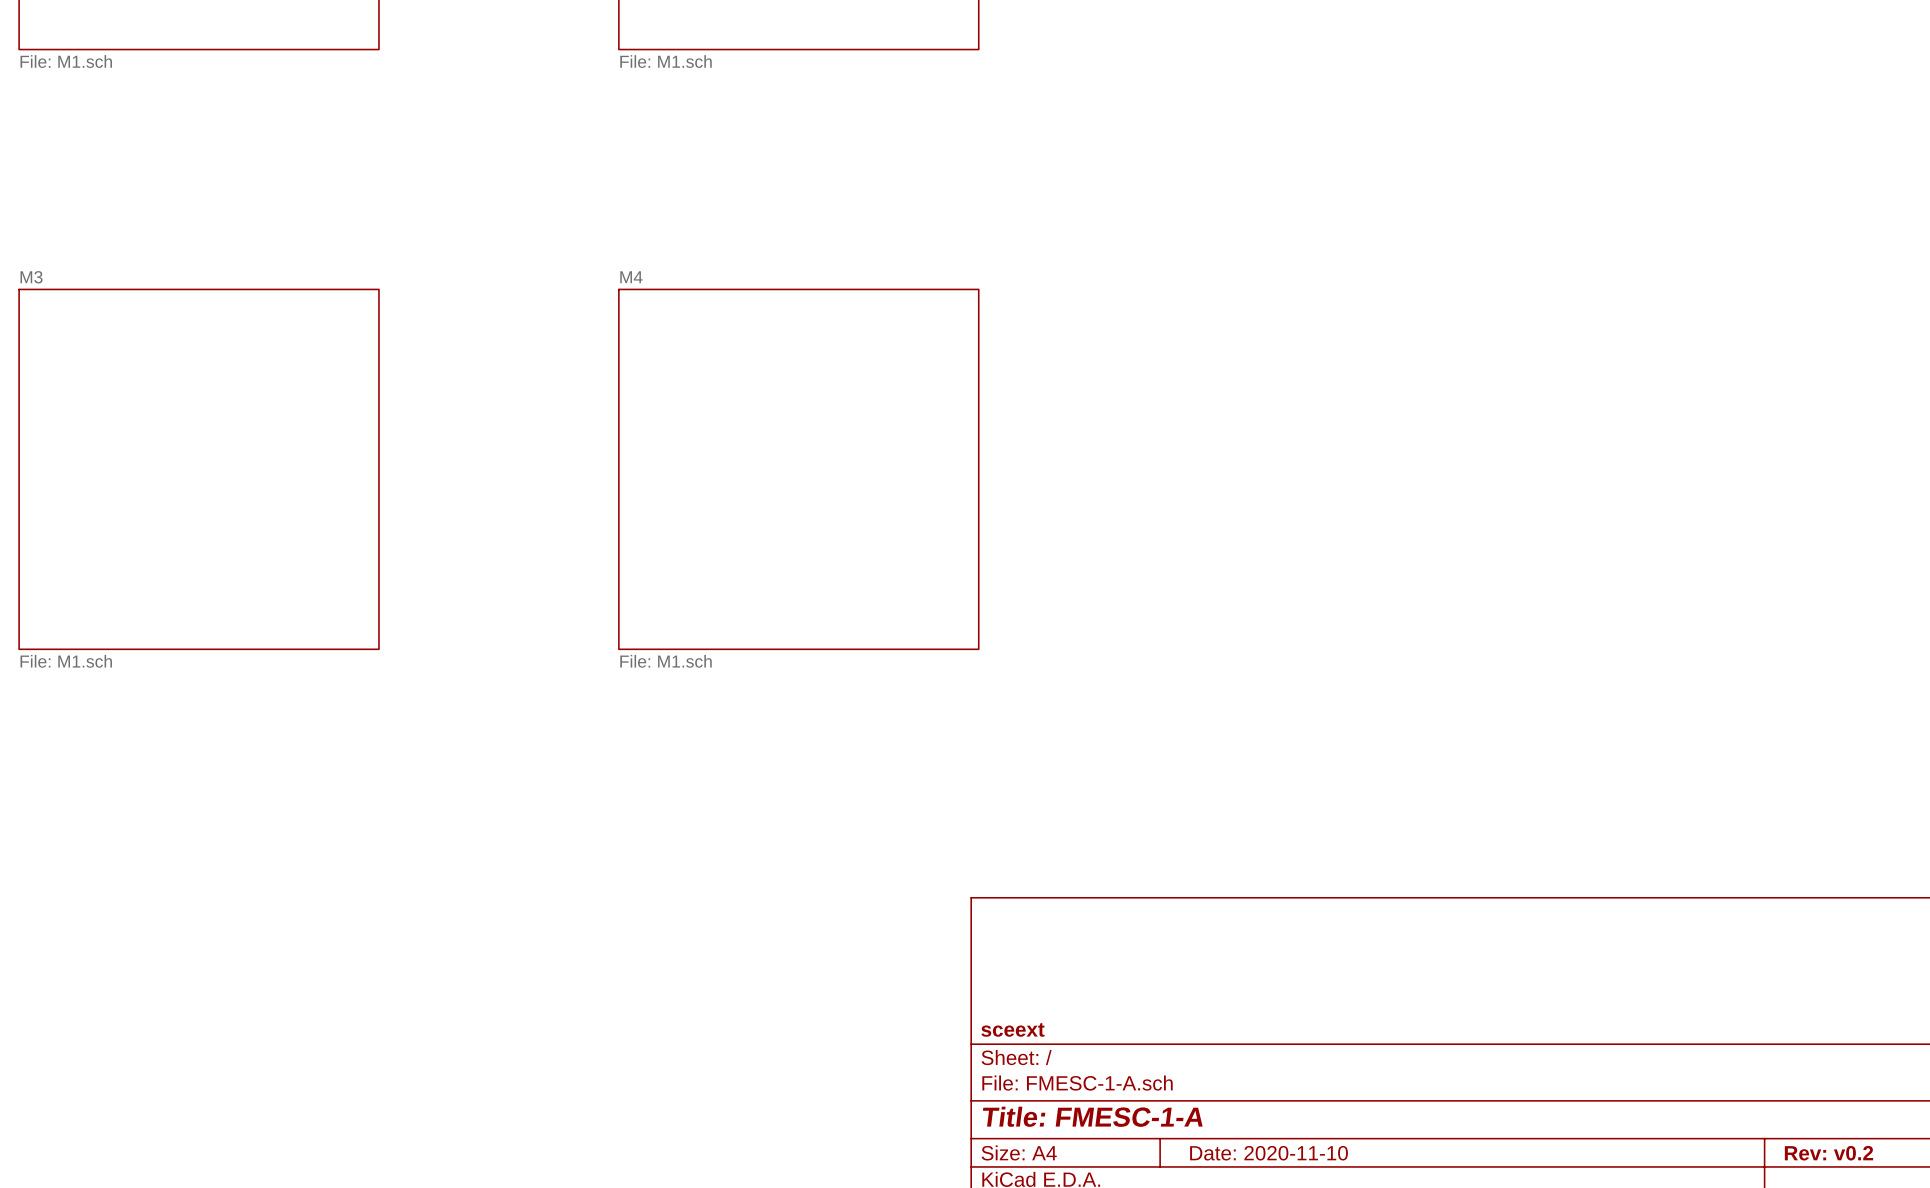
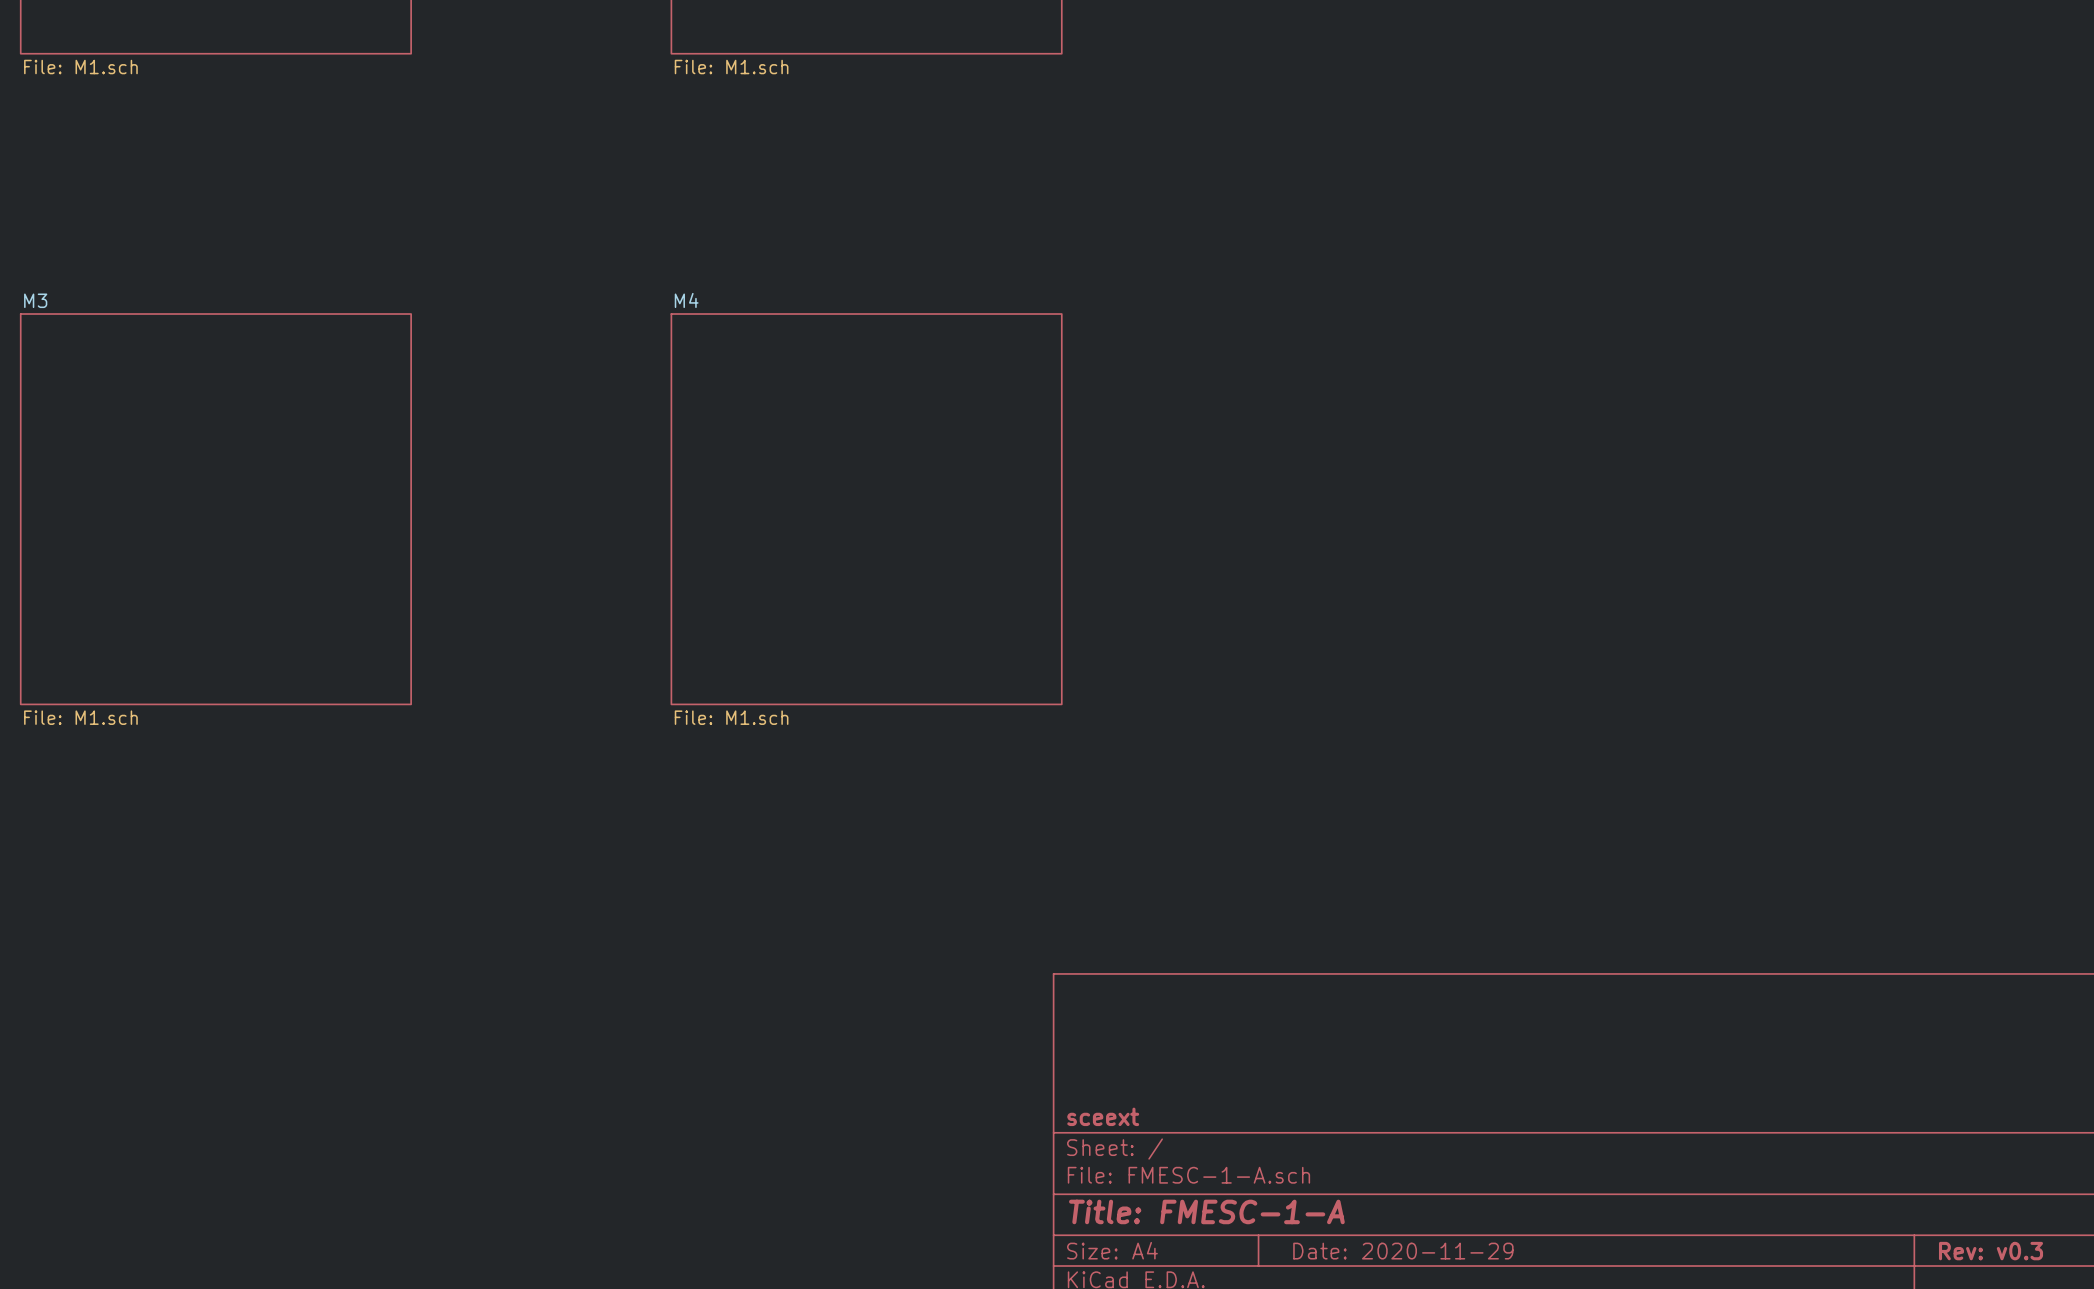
title block: Date: 2020-11-10 (1269, 1153) -> Date: 2020-11-29 (1403, 1251)
title block: Rev: v0.2 (1828, 1153) -> Rev: v0.3 (1991, 1251)

